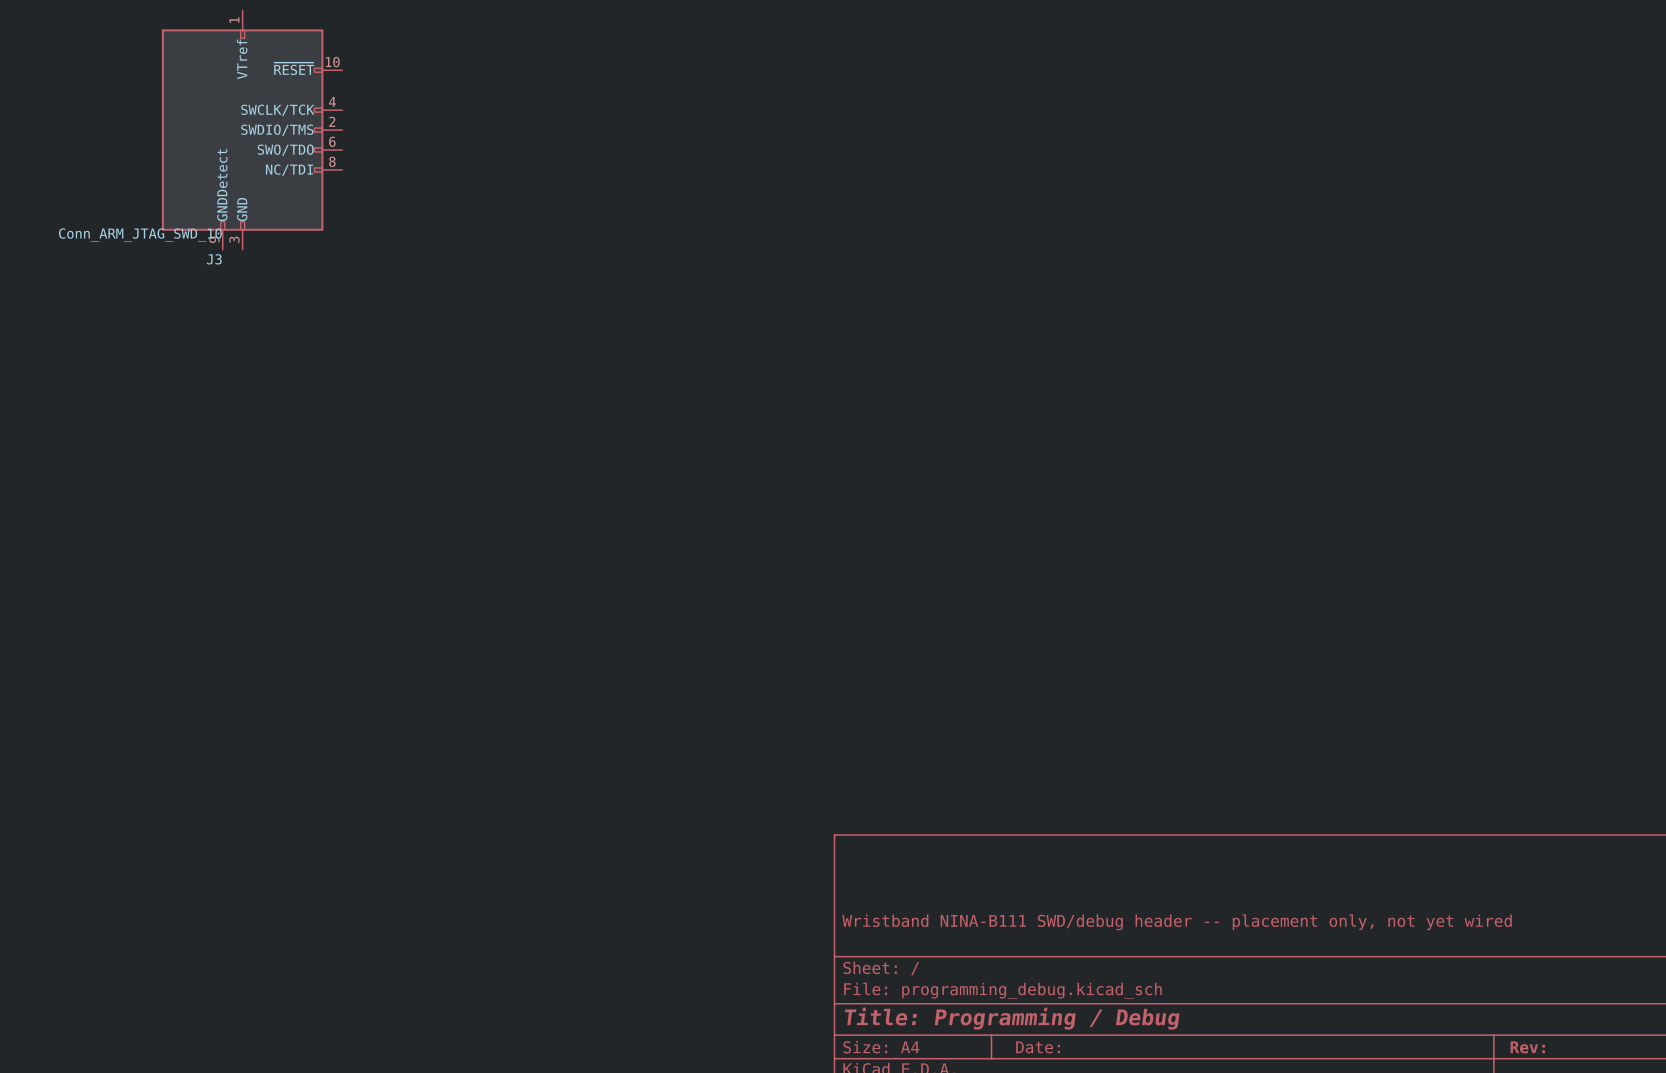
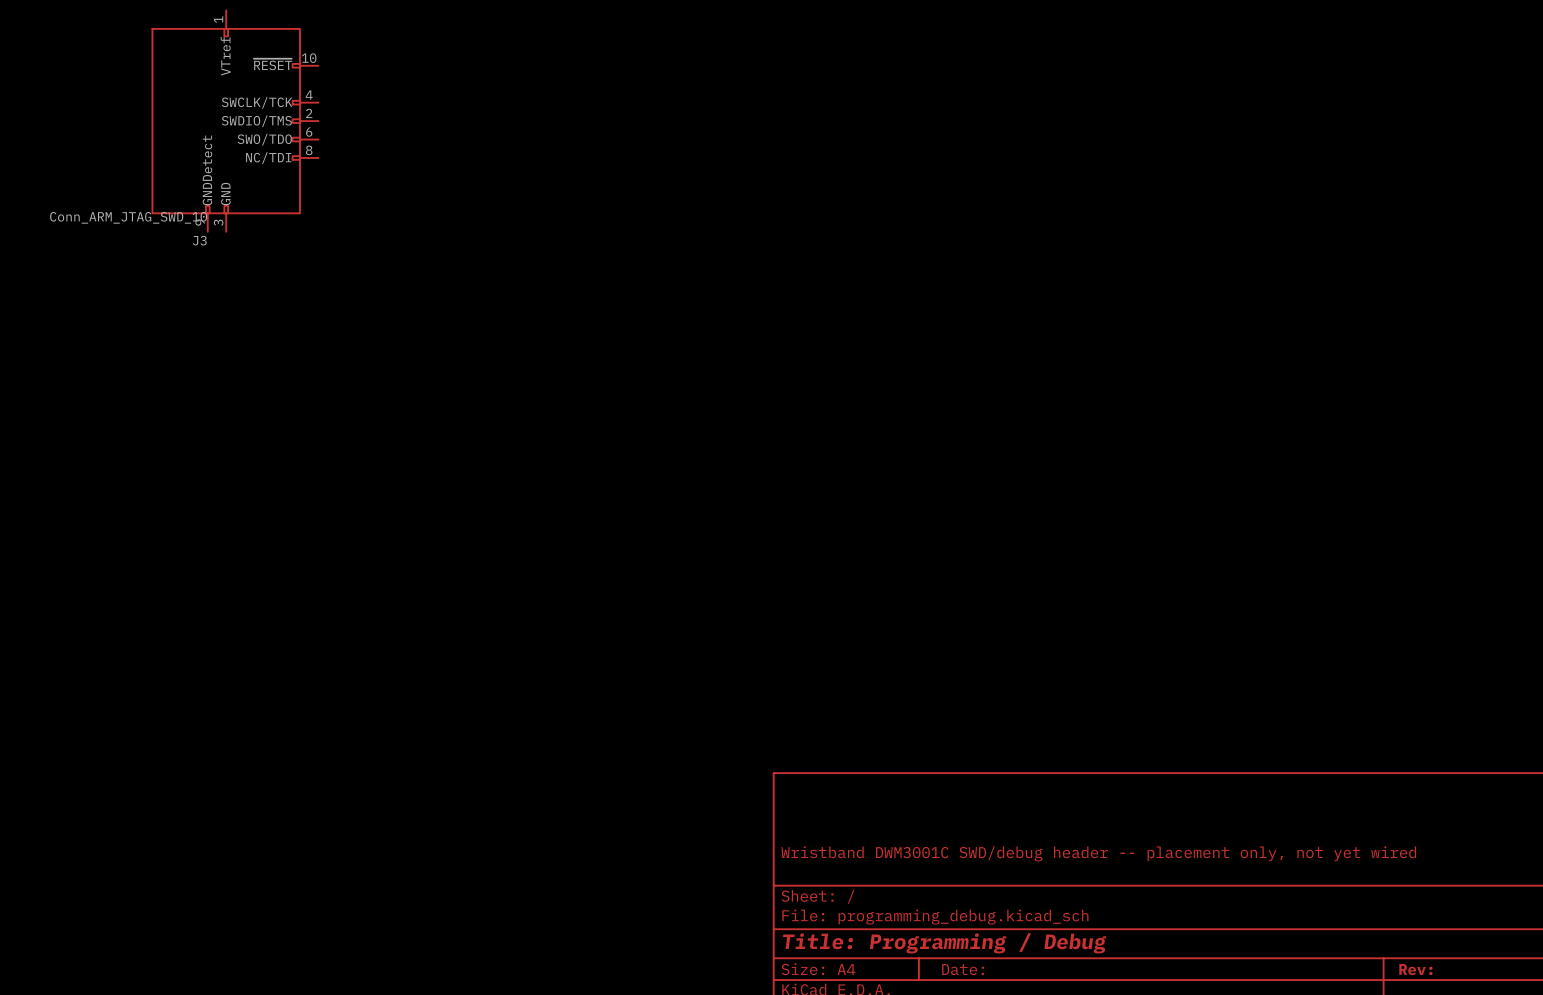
title block: Wristband NINA-B111 SWD/debug header -- placement only, not yet wired (1177, 922) -> Wristband DWM3001C SWD/debug header -- placement only, not yet wired (1098, 853)

